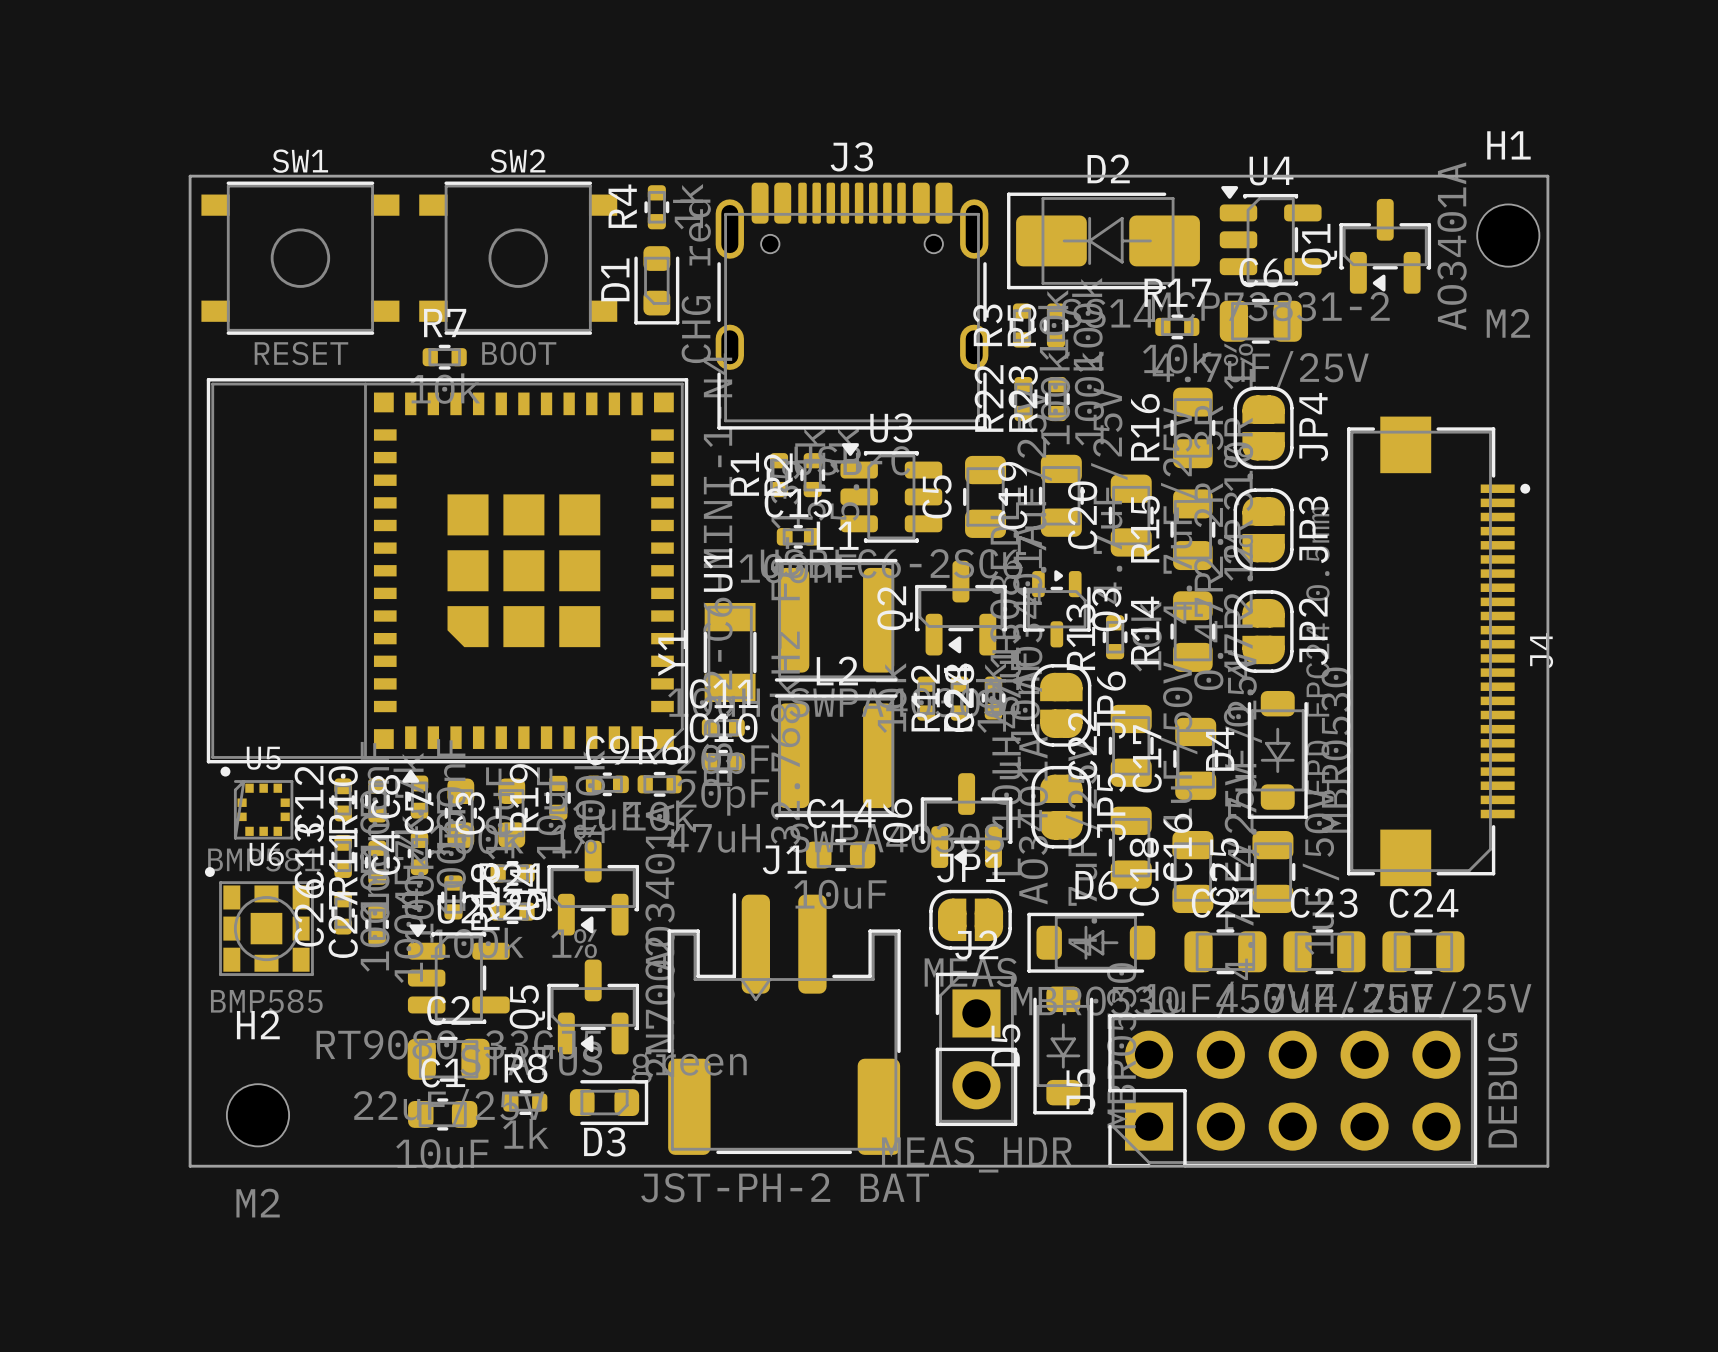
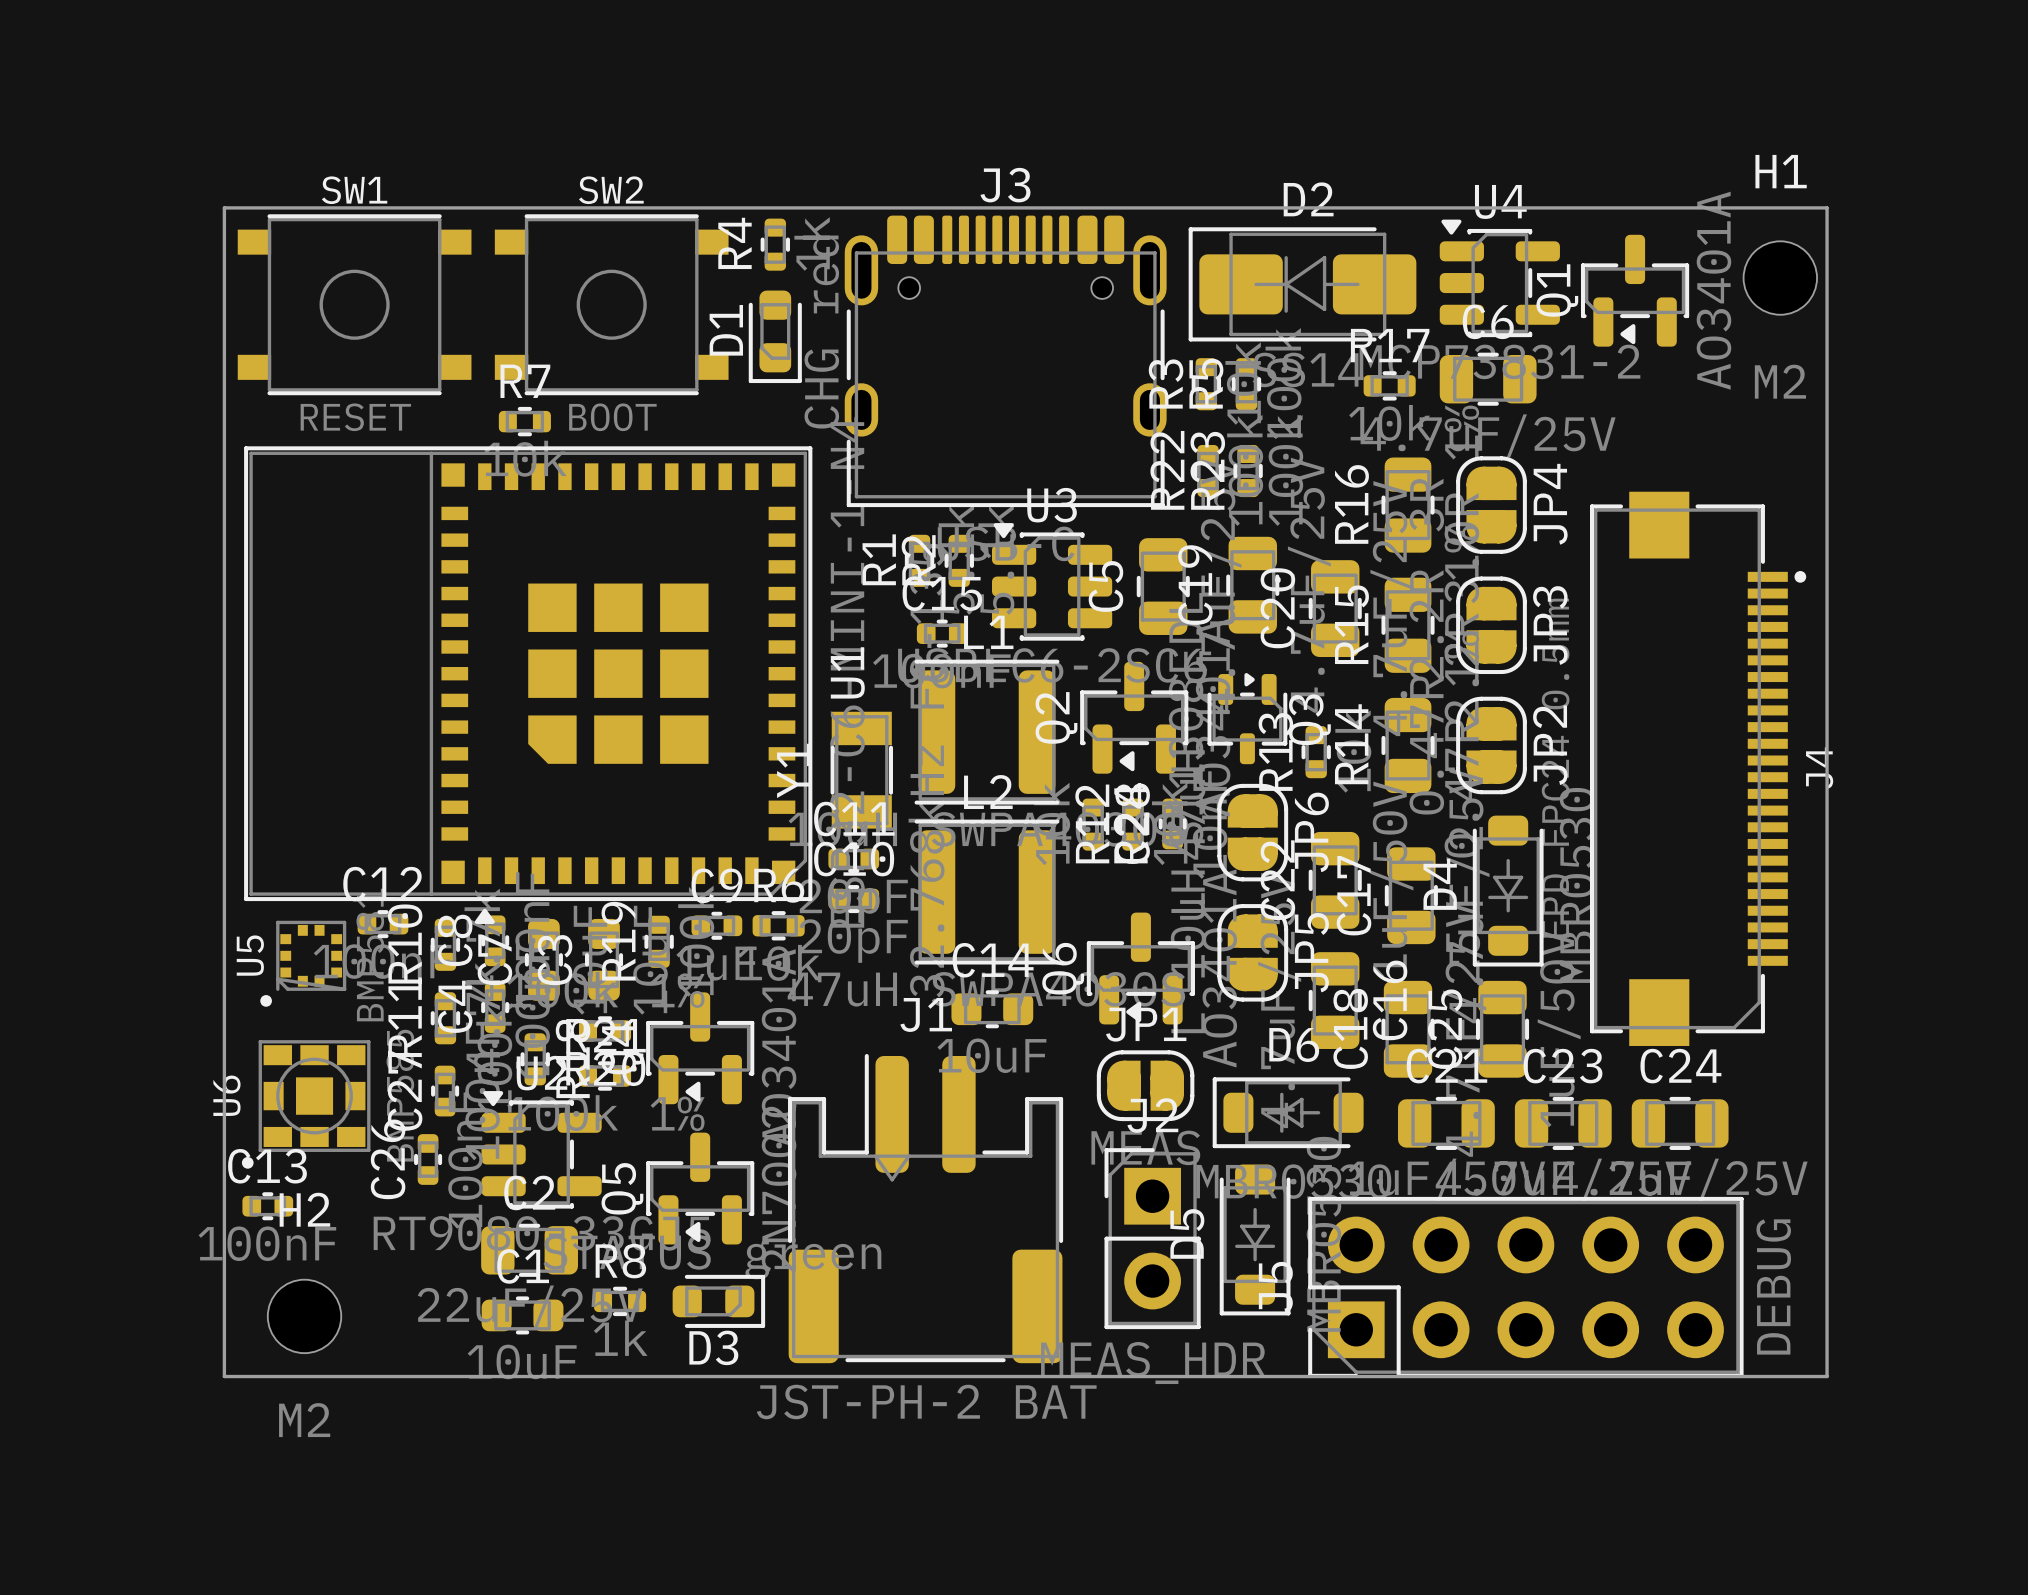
C12 rotation: 0° (343, 799) -> 90° clockwise (382, 924)
U5 rotation: 0° (256, 803) -> 90° counterclockwise (303, 963)
C13 rotation: 0° (343, 856) -> 90° clockwise (267, 1206)
C13 position: (343, 856) -> (267, 1206)
C26 position: (343, 913) -> (428, 1159)
U6 rotation: 0° (259, 921) -> 90° counterclockwise (306, 1104)

